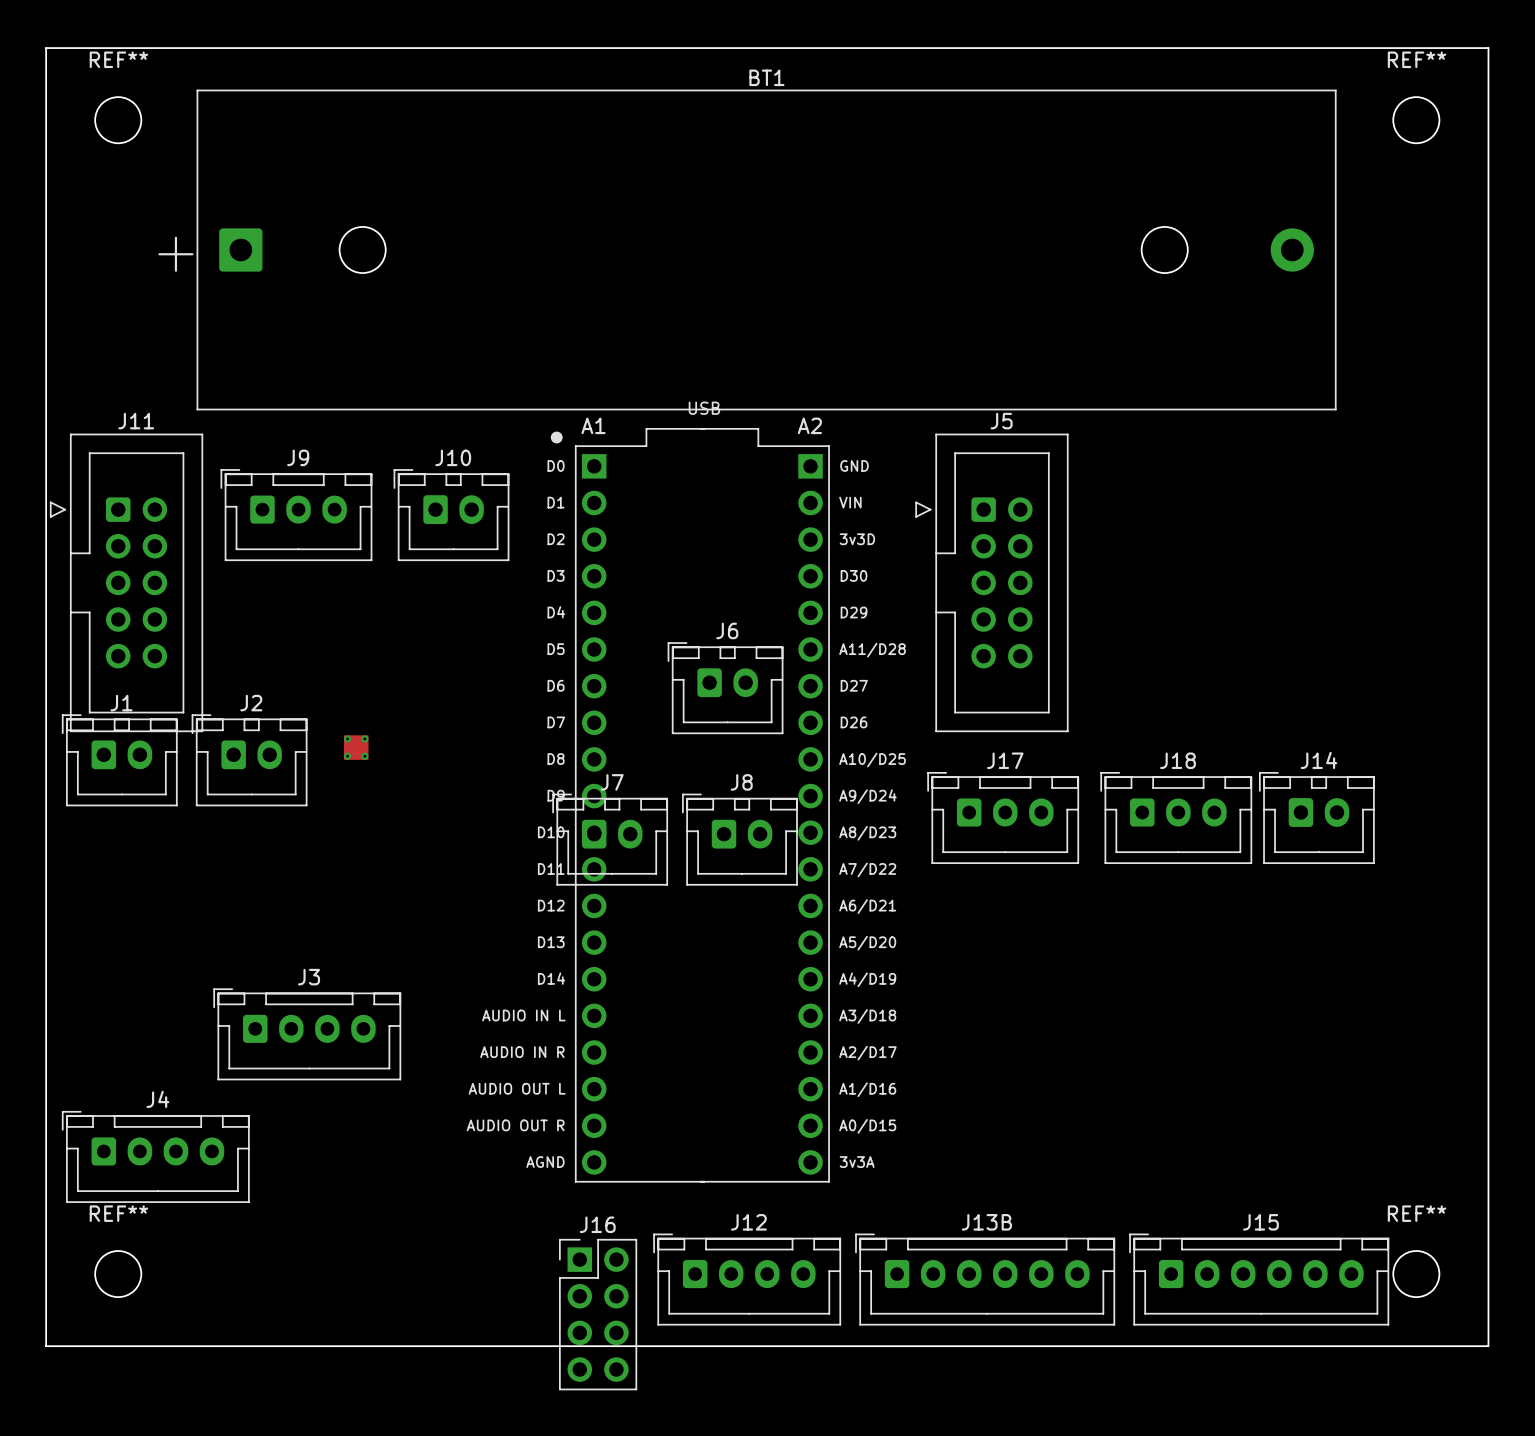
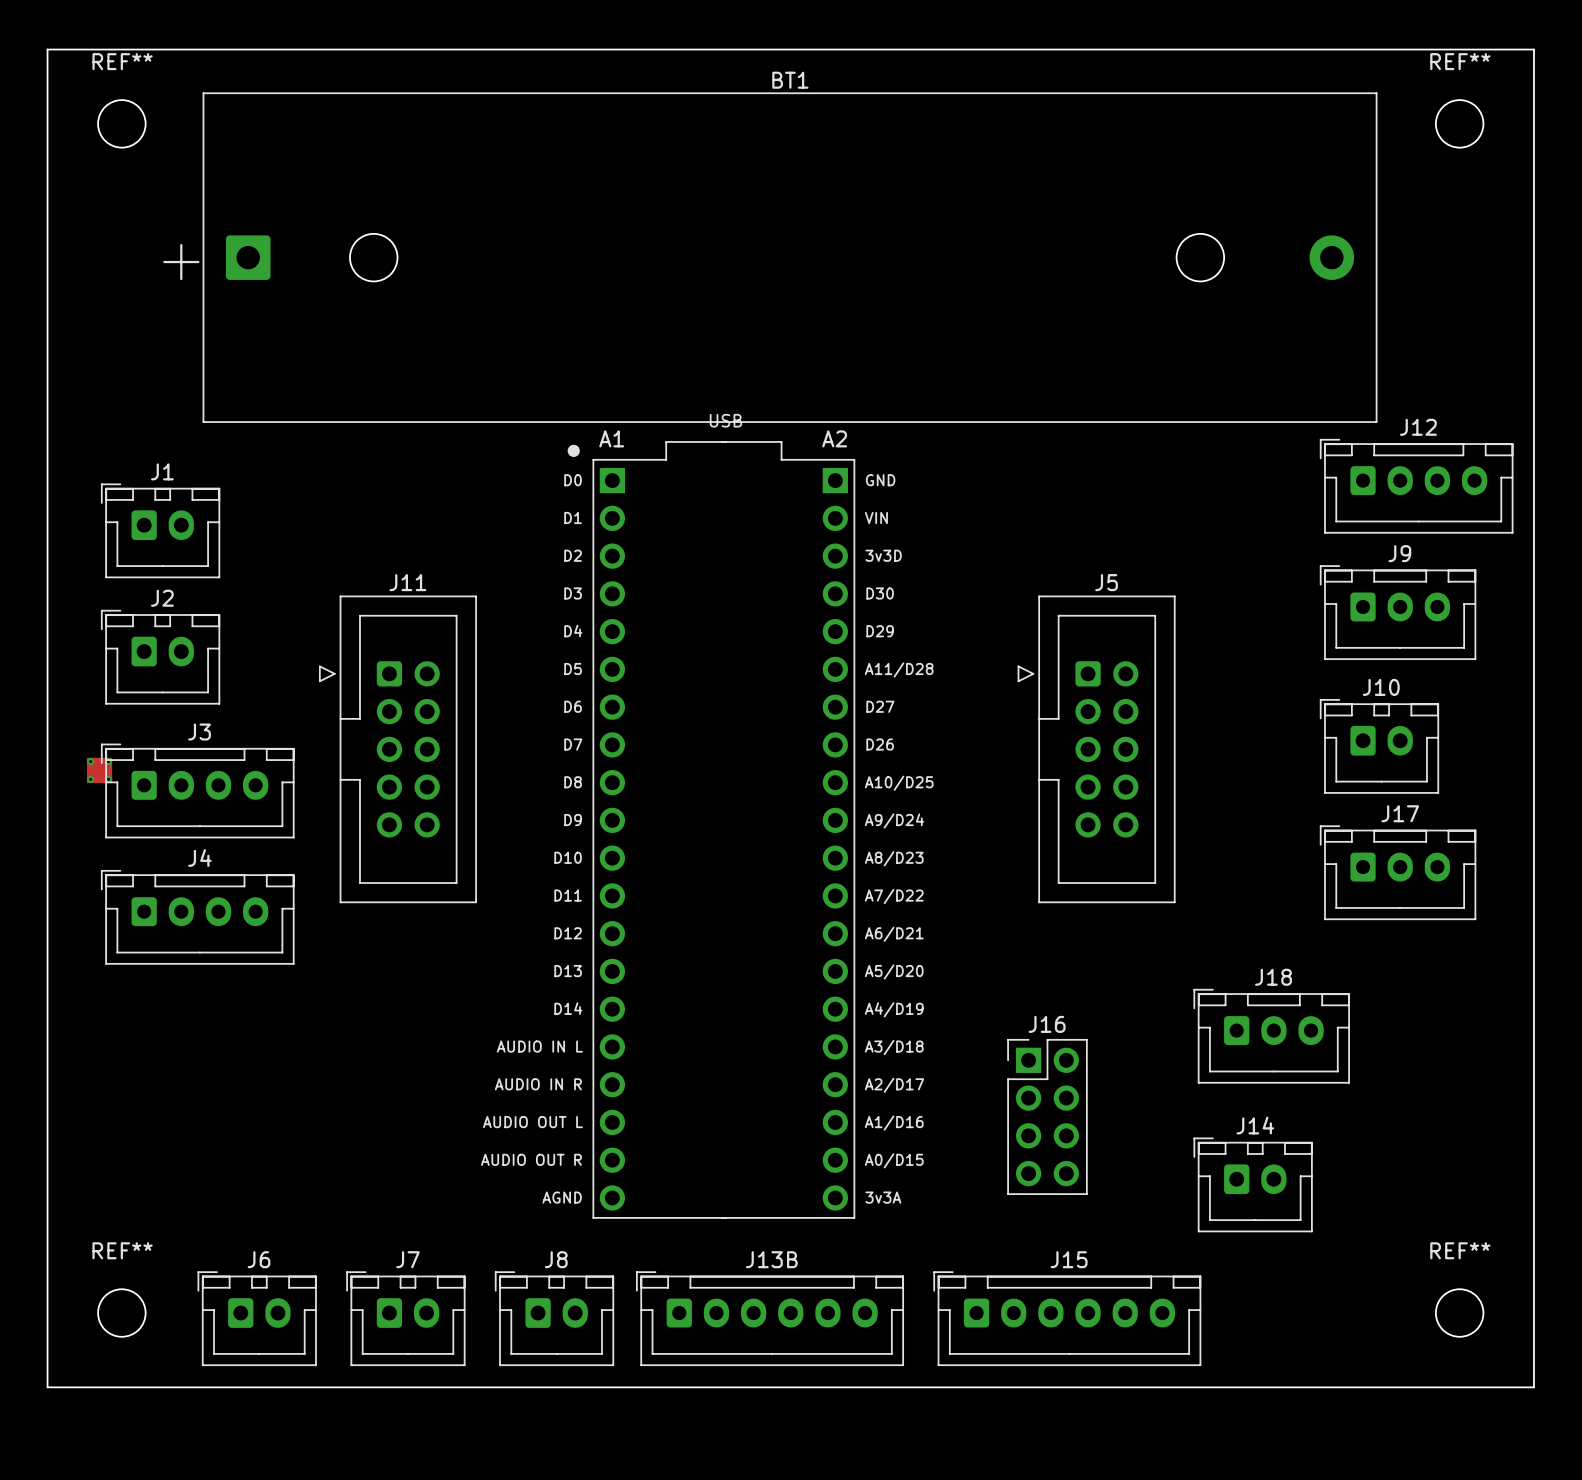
J9 position: (296, 515) -> (1398, 612)
J10 position: (451, 515) -> (1379, 746)
J11 position: (126, 582) -> (397, 749)
J5 position: (991, 582) -> (1096, 749)
J6 position: (725, 688) -> (257, 1318)
part position: (356, 747) -> (99, 770)
J1 position: (119, 760) -> (160, 530)
J2 position: (249, 760) -> (160, 657)
J17 position: (1003, 817) -> (1398, 872)
J18 position: (1176, 817) -> (1271, 1036)
J14 position: (1316, 817) -> (1253, 1184)
J7 position: (610, 839) -> (405, 1318)
J8 position: (739, 839) -> (554, 1318)
J3 position: (307, 1034) -> (197, 790)
J4 position: (155, 1156) -> (197, 917)
J12 position: (747, 1279) -> (1416, 486)
J13B position: (985, 1279) -> (770, 1318)
J15 position: (1259, 1279) -> (1067, 1318)
J16 position: (598, 1314) -> (1047, 1116)

